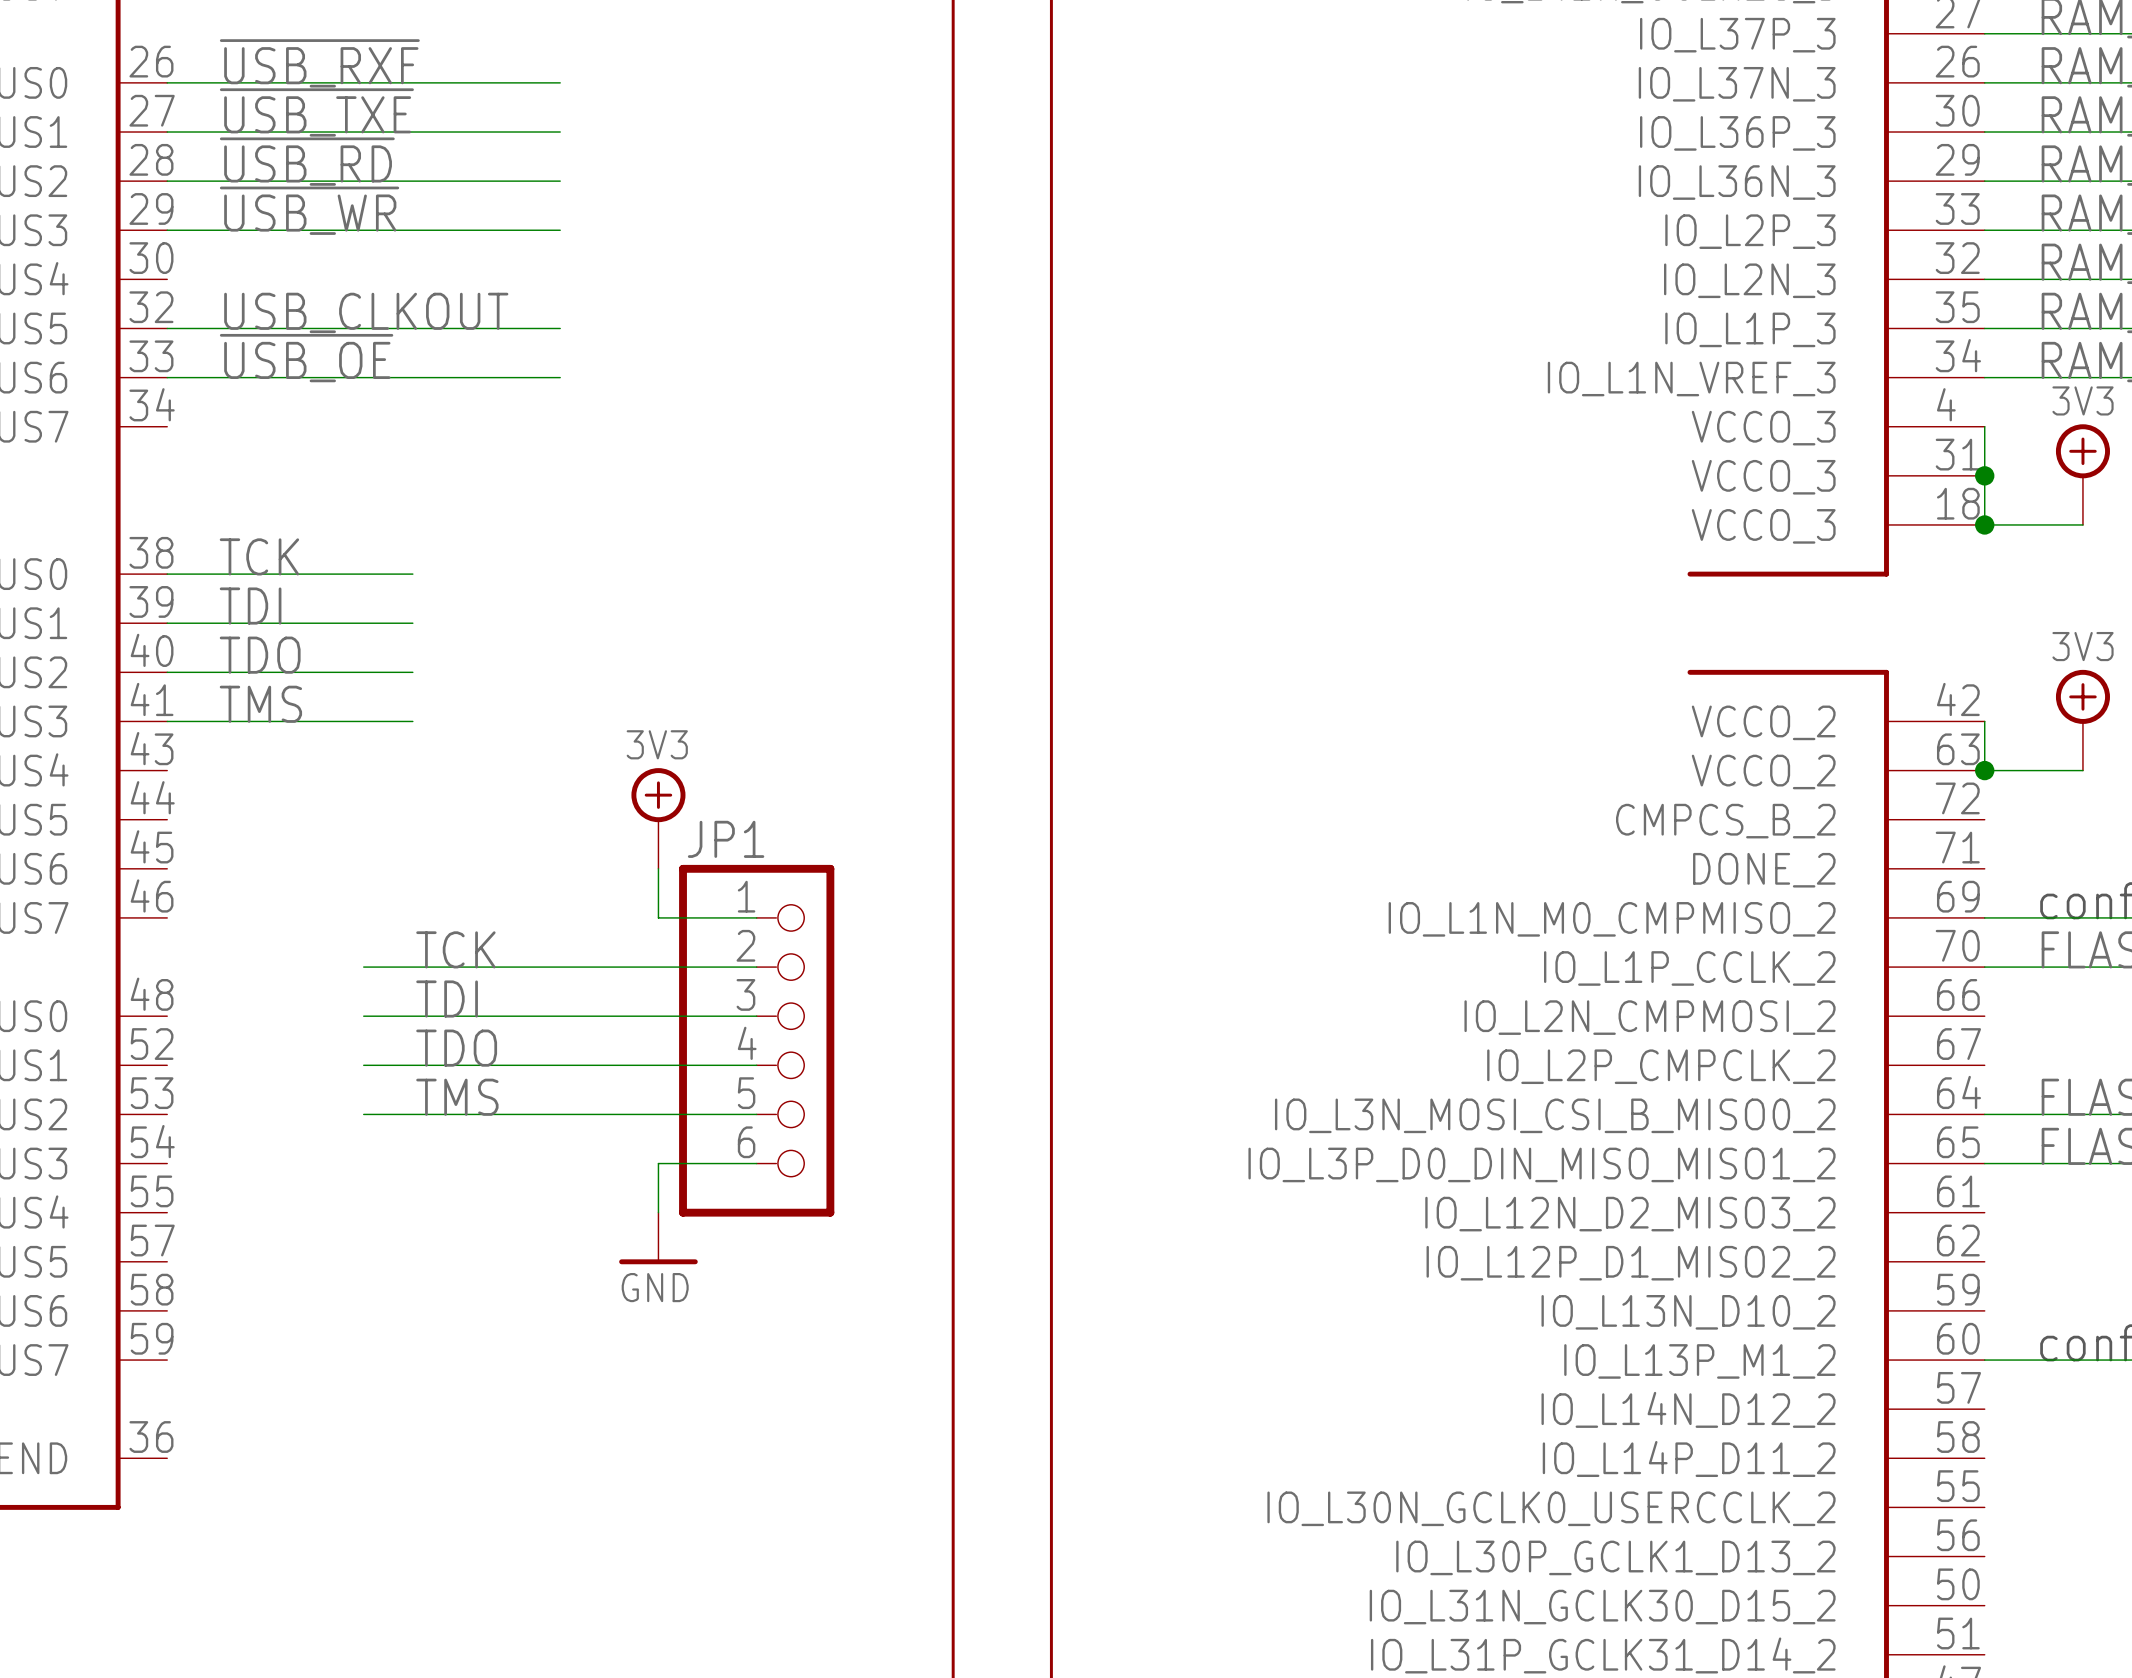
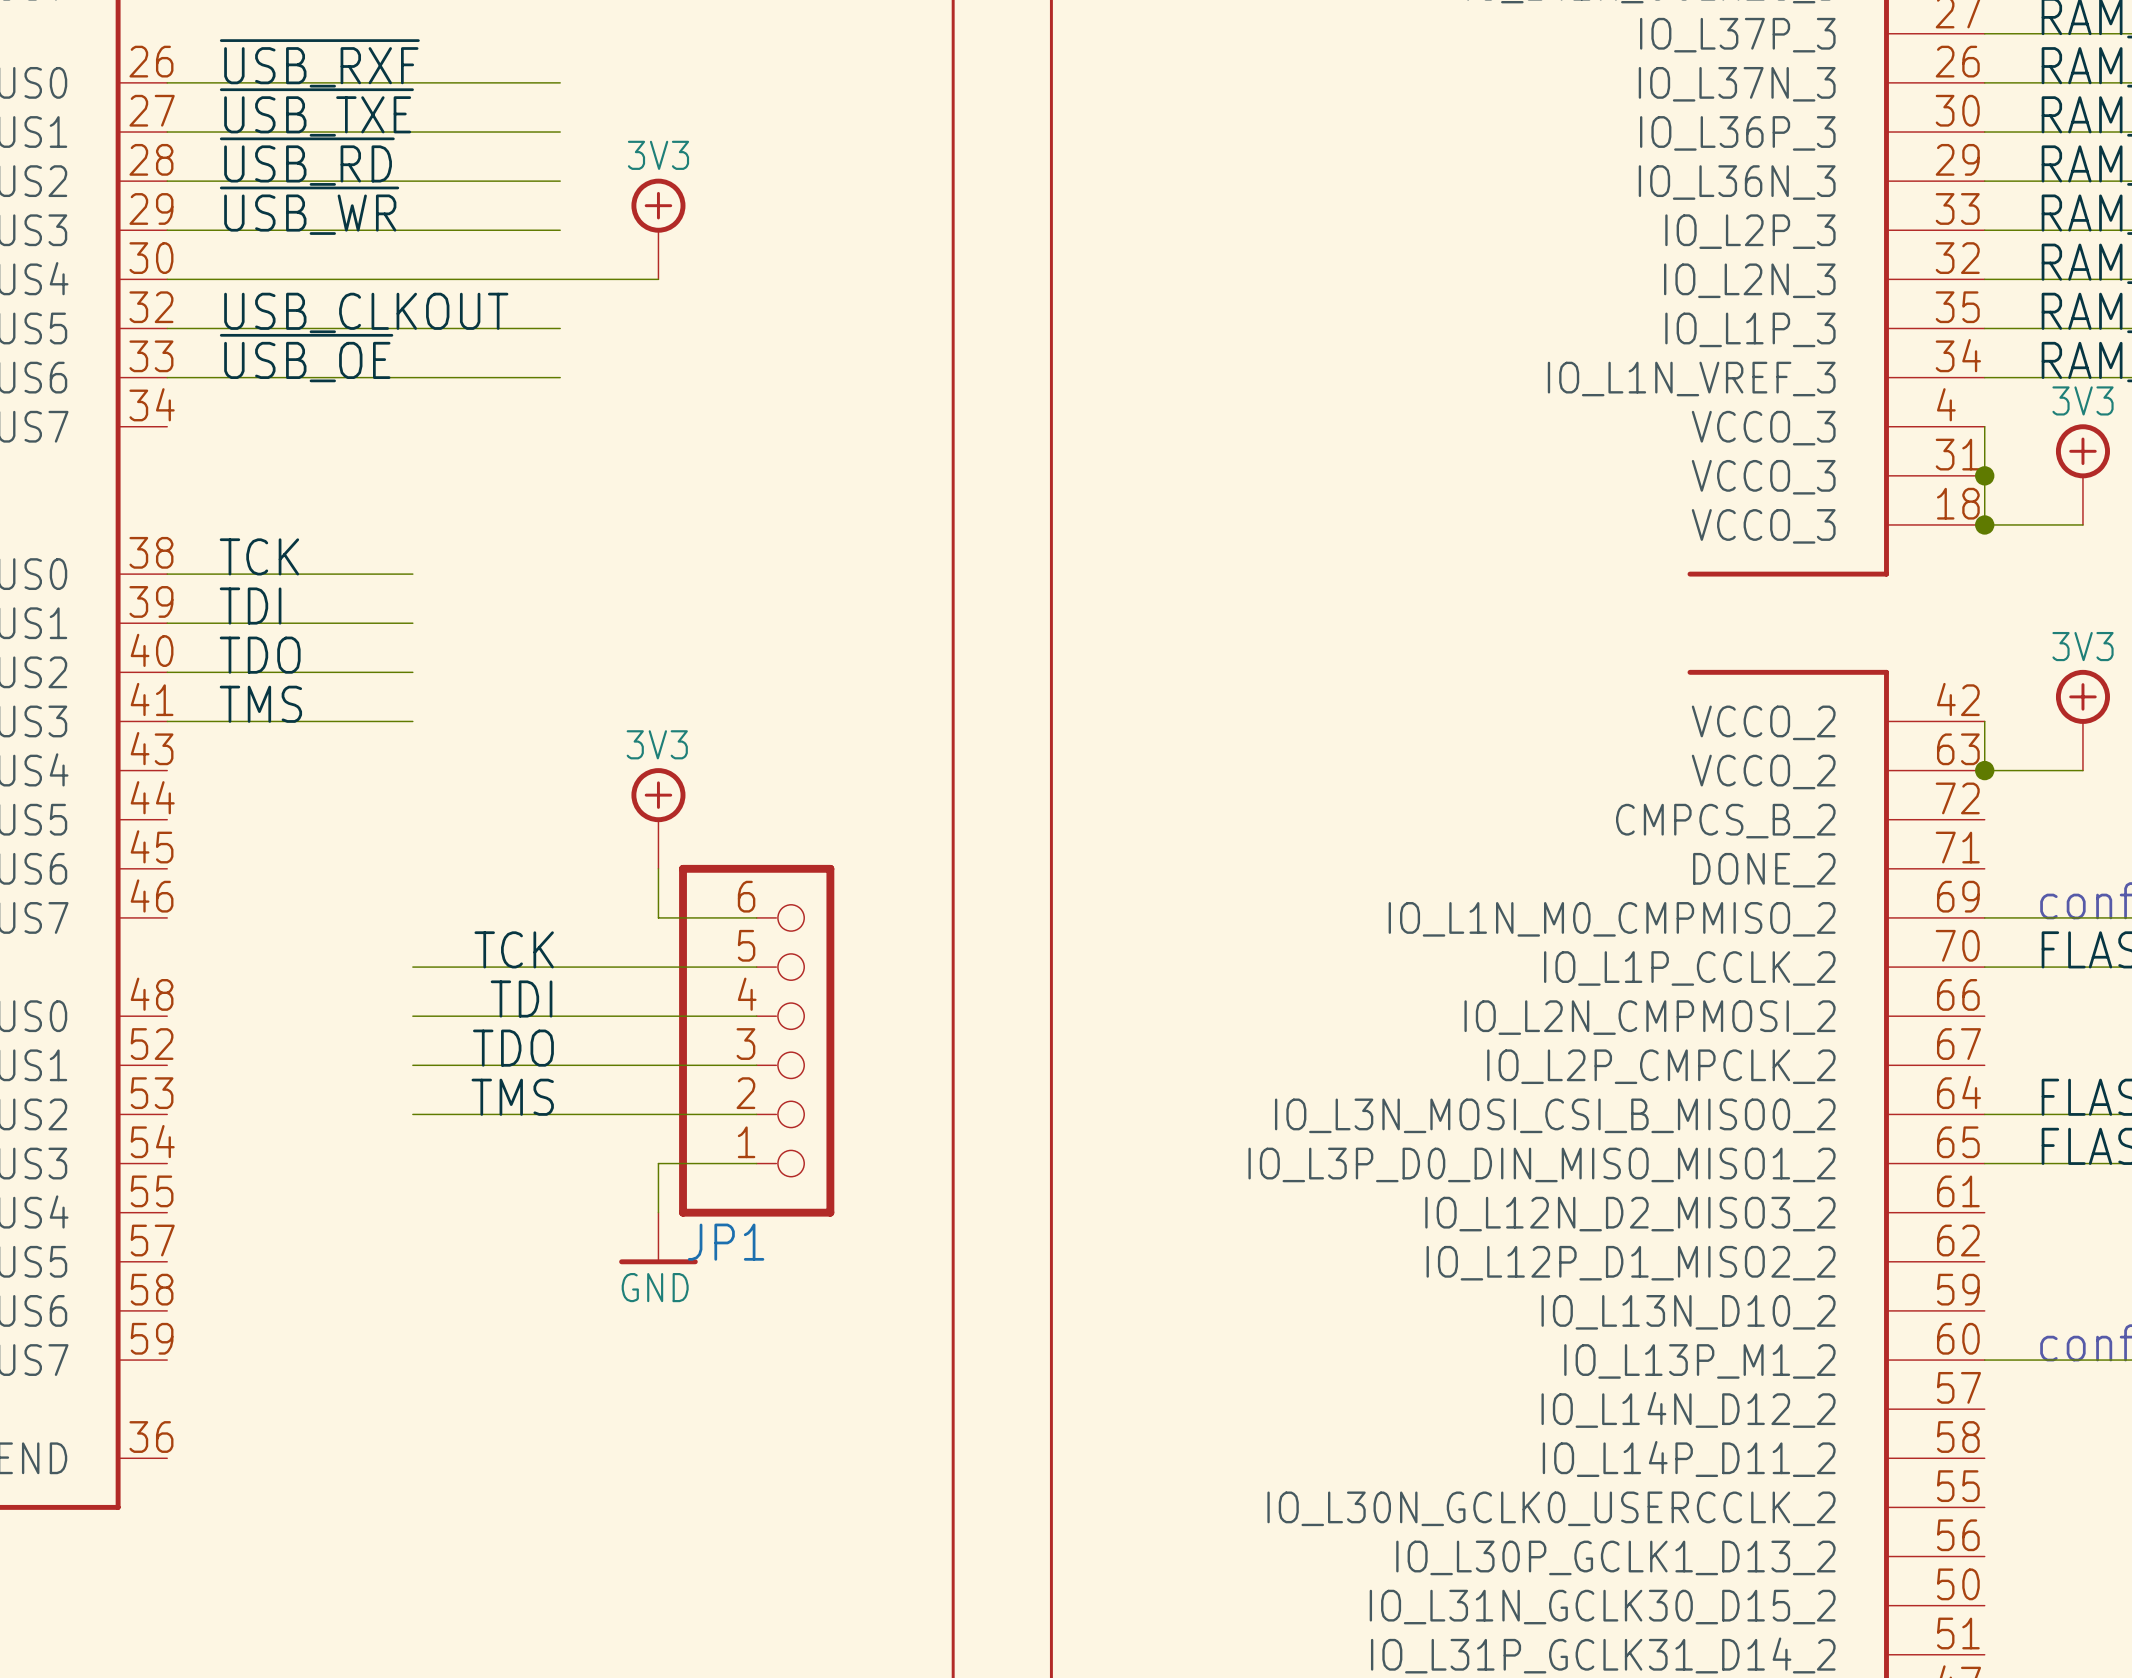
power symbol: none -> 3V3 (658, 229)
wire: none -> (167, 279) (658, 279)
label position: TCK (455, 949) -> TCK (514, 949)
wire: (363, 967) (412, 967) -> none
label position: TDI (447, 998) -> TDI (521, 998)
wire: (363, 1016) (412, 1016) -> none
JP1 flip: as is (756, 1040) -> up-down (756, 1040)
label position: TDO (456, 1048) -> TDO (513, 1048)
wire: (363, 1065) (412, 1065) -> none
label position: TMS (457, 1097) -> TMS (512, 1097)
wire: (363, 1114) (412, 1114) -> none

